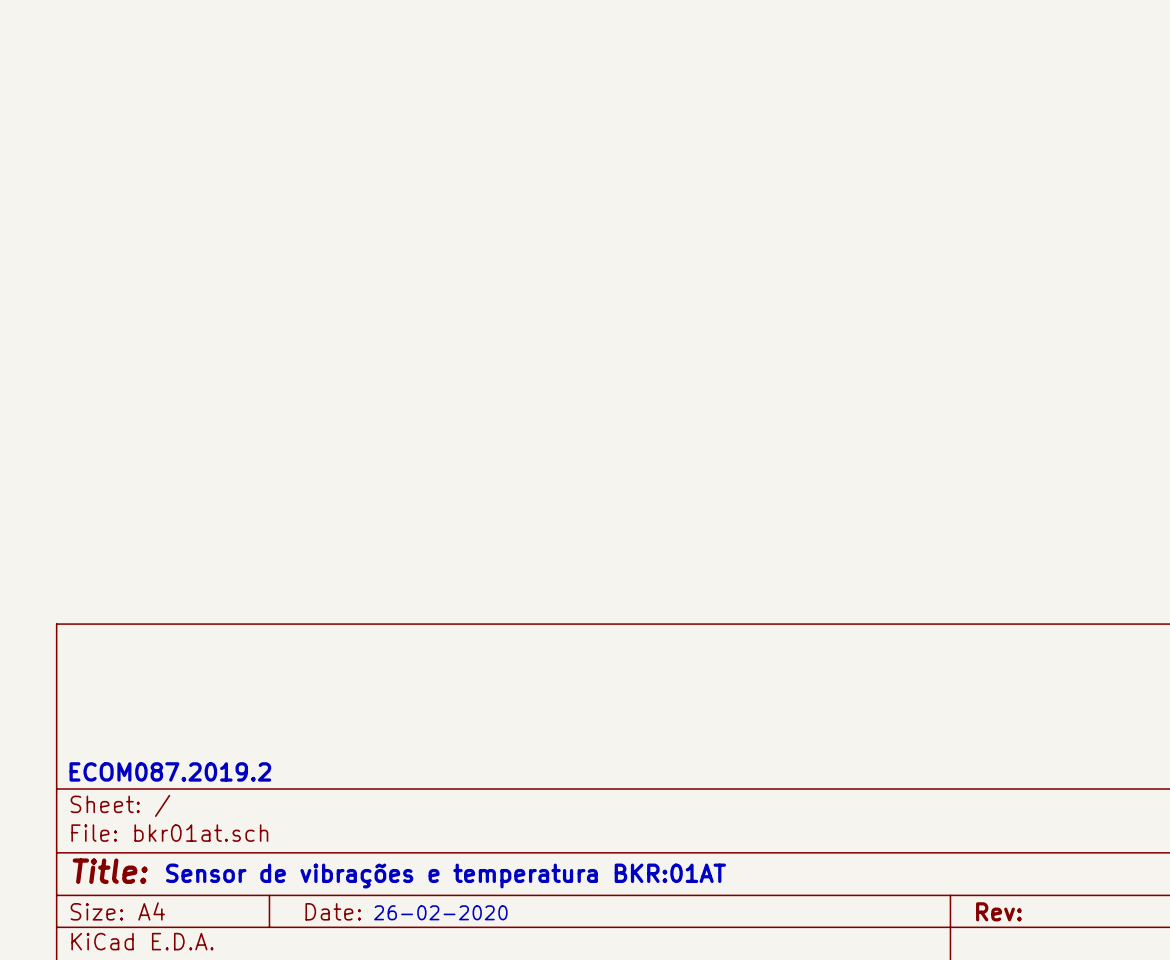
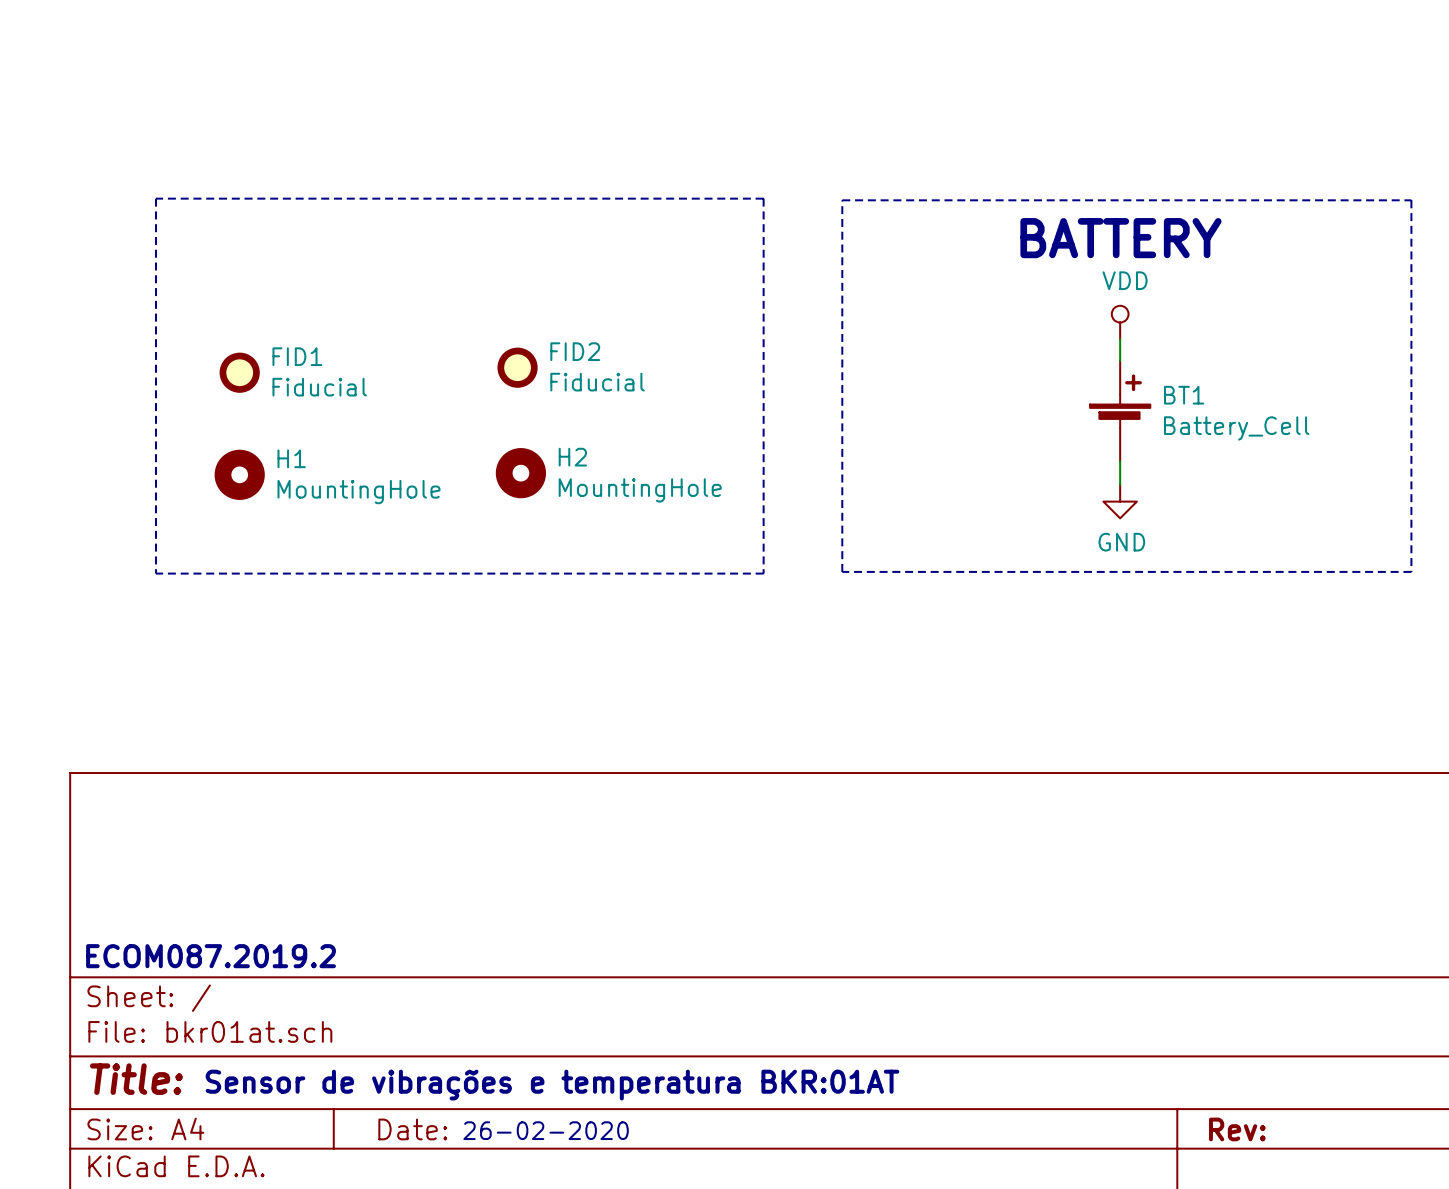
line: none -> (156, 198) (763, 198) (763, 573) (156, 573) (156, 198)
line: none -> (842, 200) (1411, 200) (1411, 571) (842, 571) (842, 200)
text: none -> BATTERY (1120, 238)
power symbol: none -> VDD (1120, 322)
wire: none -> (1120, 339) (1120, 361)
FID2: none -> Fiducial (517, 367)
FID1: none -> Fiducial (239, 372)
BT1: none -> Battery_Cell (1120, 411)
wire: none -> (1120, 461) (1120, 484)
H2: none -> MountingHole (520, 473)
H1: none -> MountingHole (239, 474)
power symbol: none -> GND (1120, 501)

